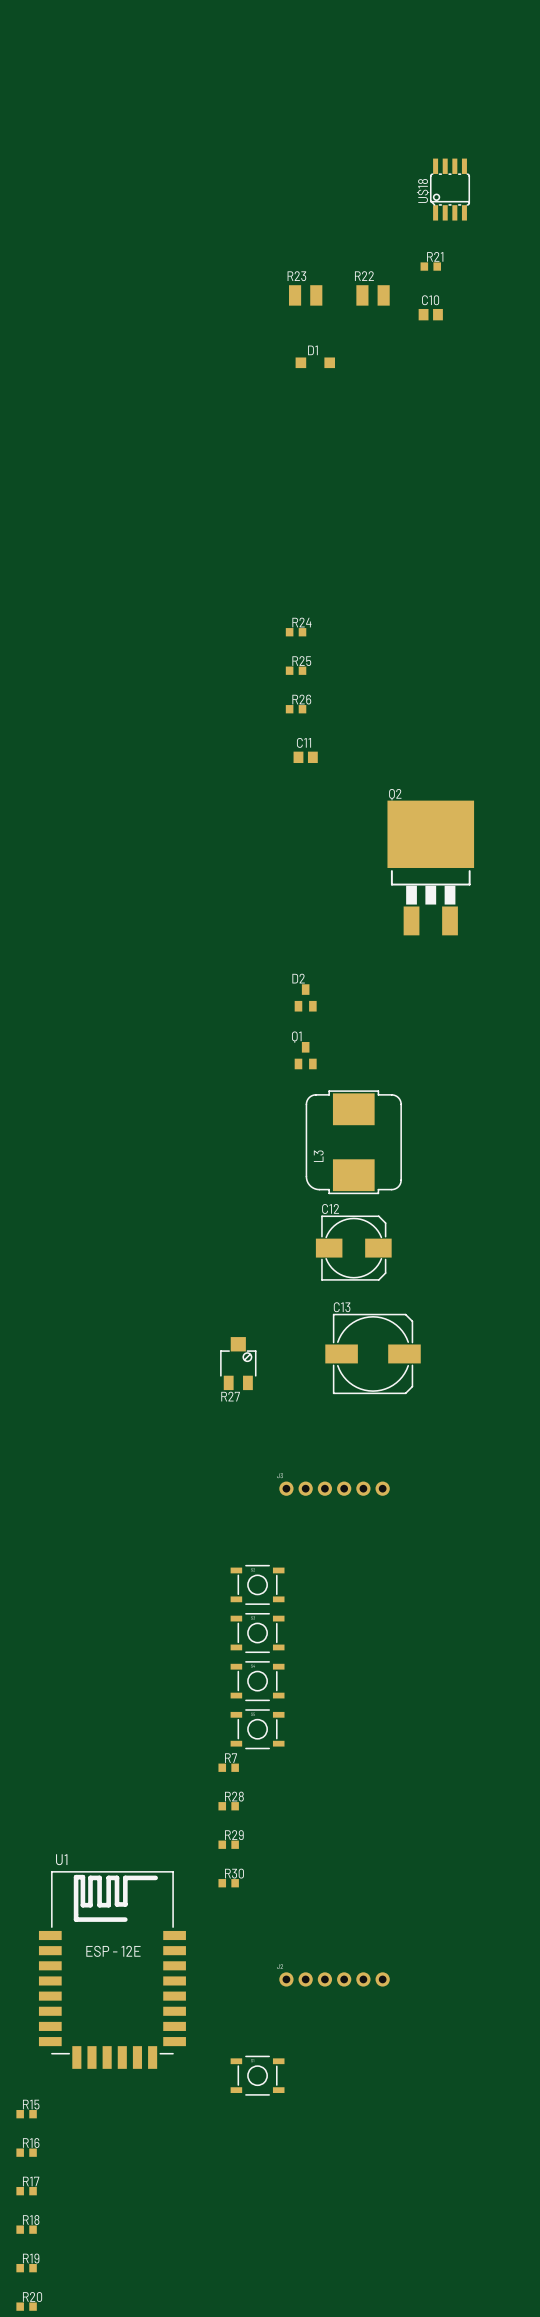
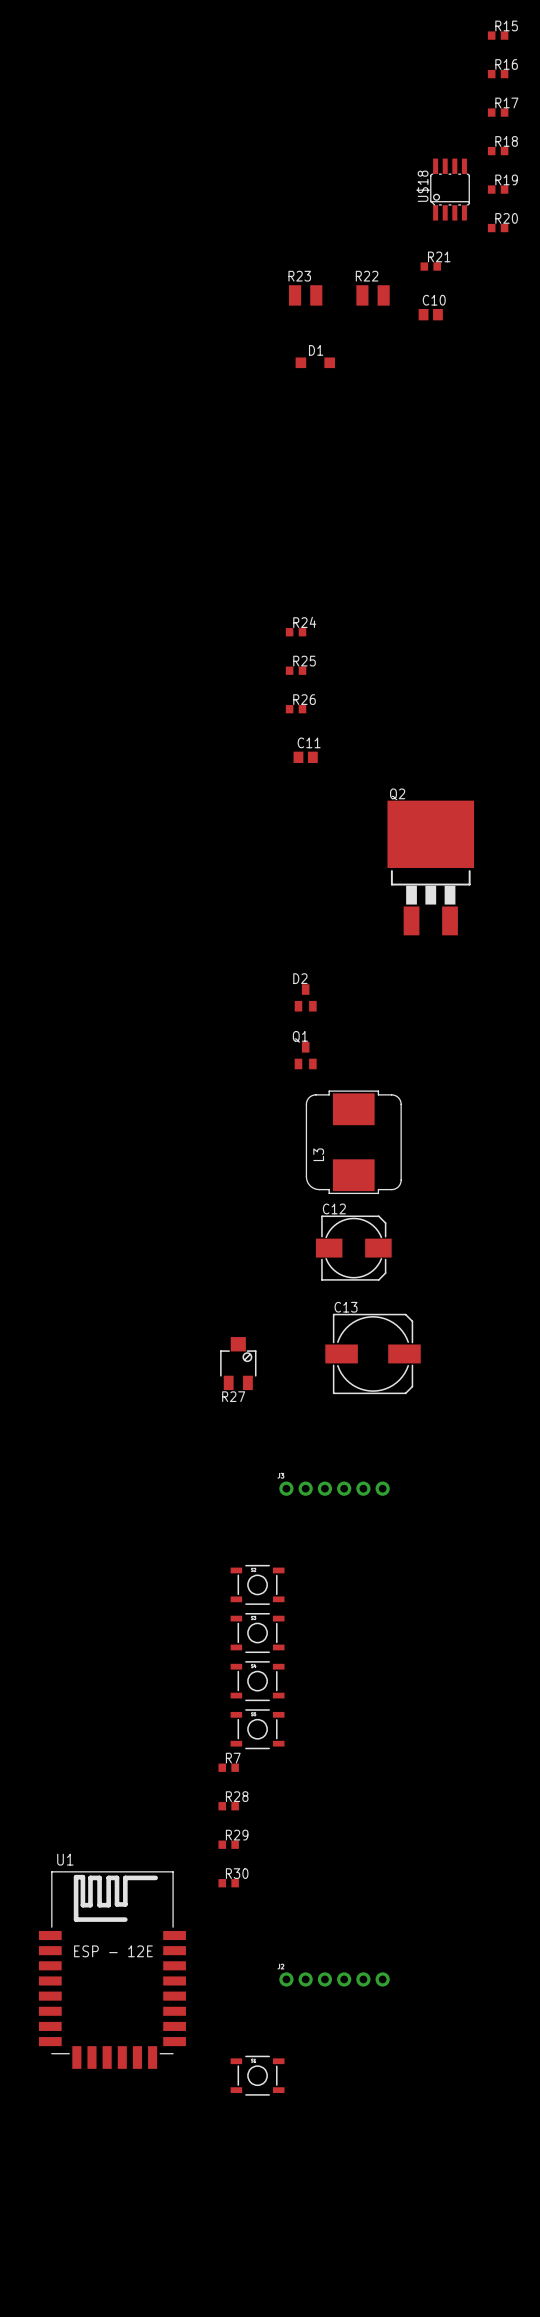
R15 position: (26, 2114) -> (498, 35)
R16 position: (26, 2152) -> (498, 74)
R17 position: (26, 2191) -> (498, 112)
R18 position: (26, 2229) -> (498, 151)
R19 position: (26, 2268) -> (498, 189)
R20 position: (26, 2306) -> (498, 228)

